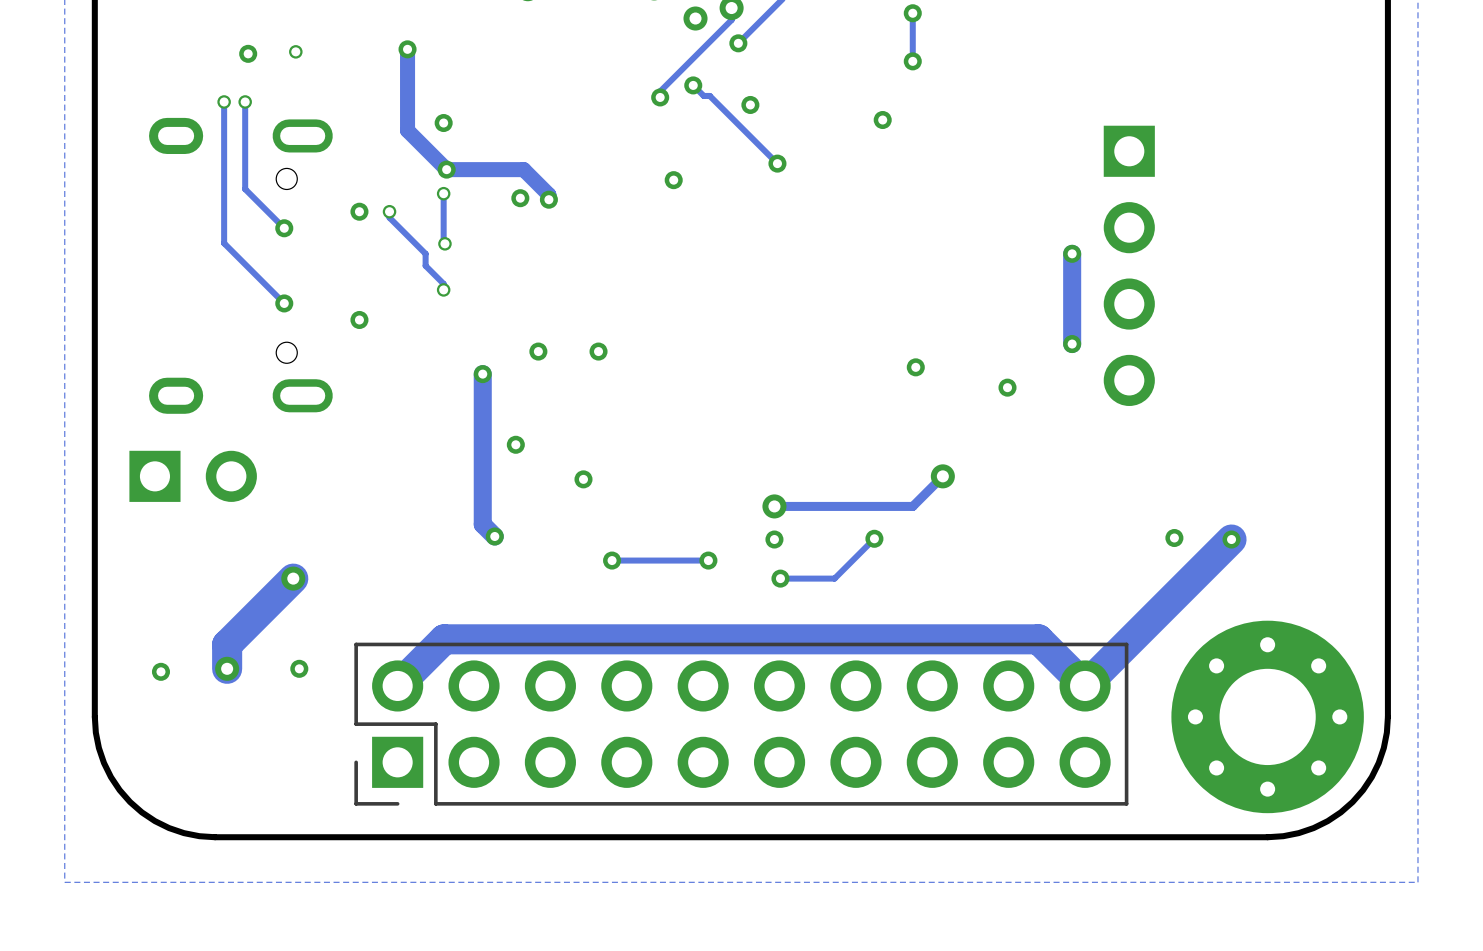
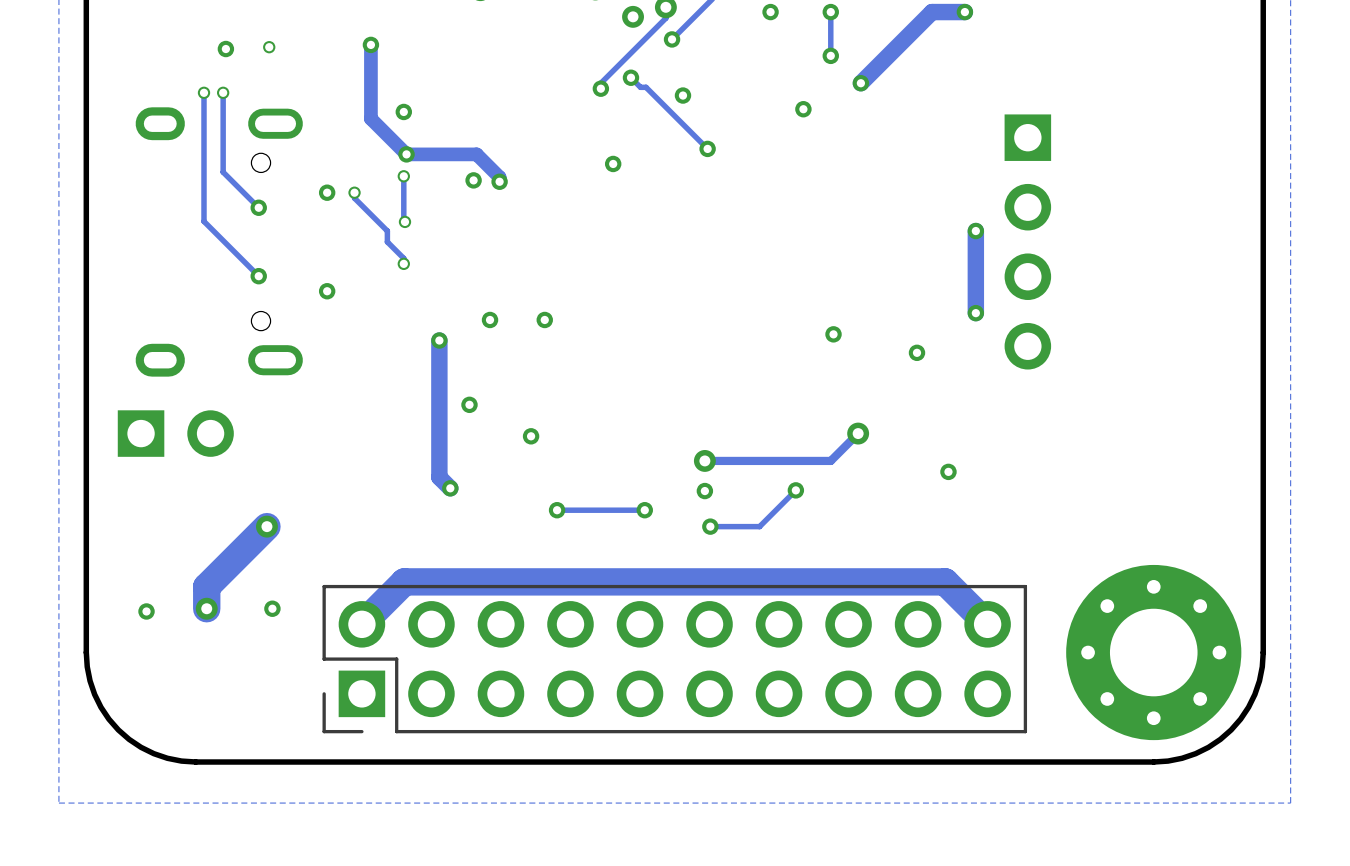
via: none -> (770, 12)
track: none -> (964, 12) (932, 12) (860, 83)
via: none -> (964, 12)
via: none -> (860, 83)
via: none -> (948, 471)
via: (1174, 538) -> none
track: (1231, 539) (1085, 685) -> none
via: (1231, 539) -> none

